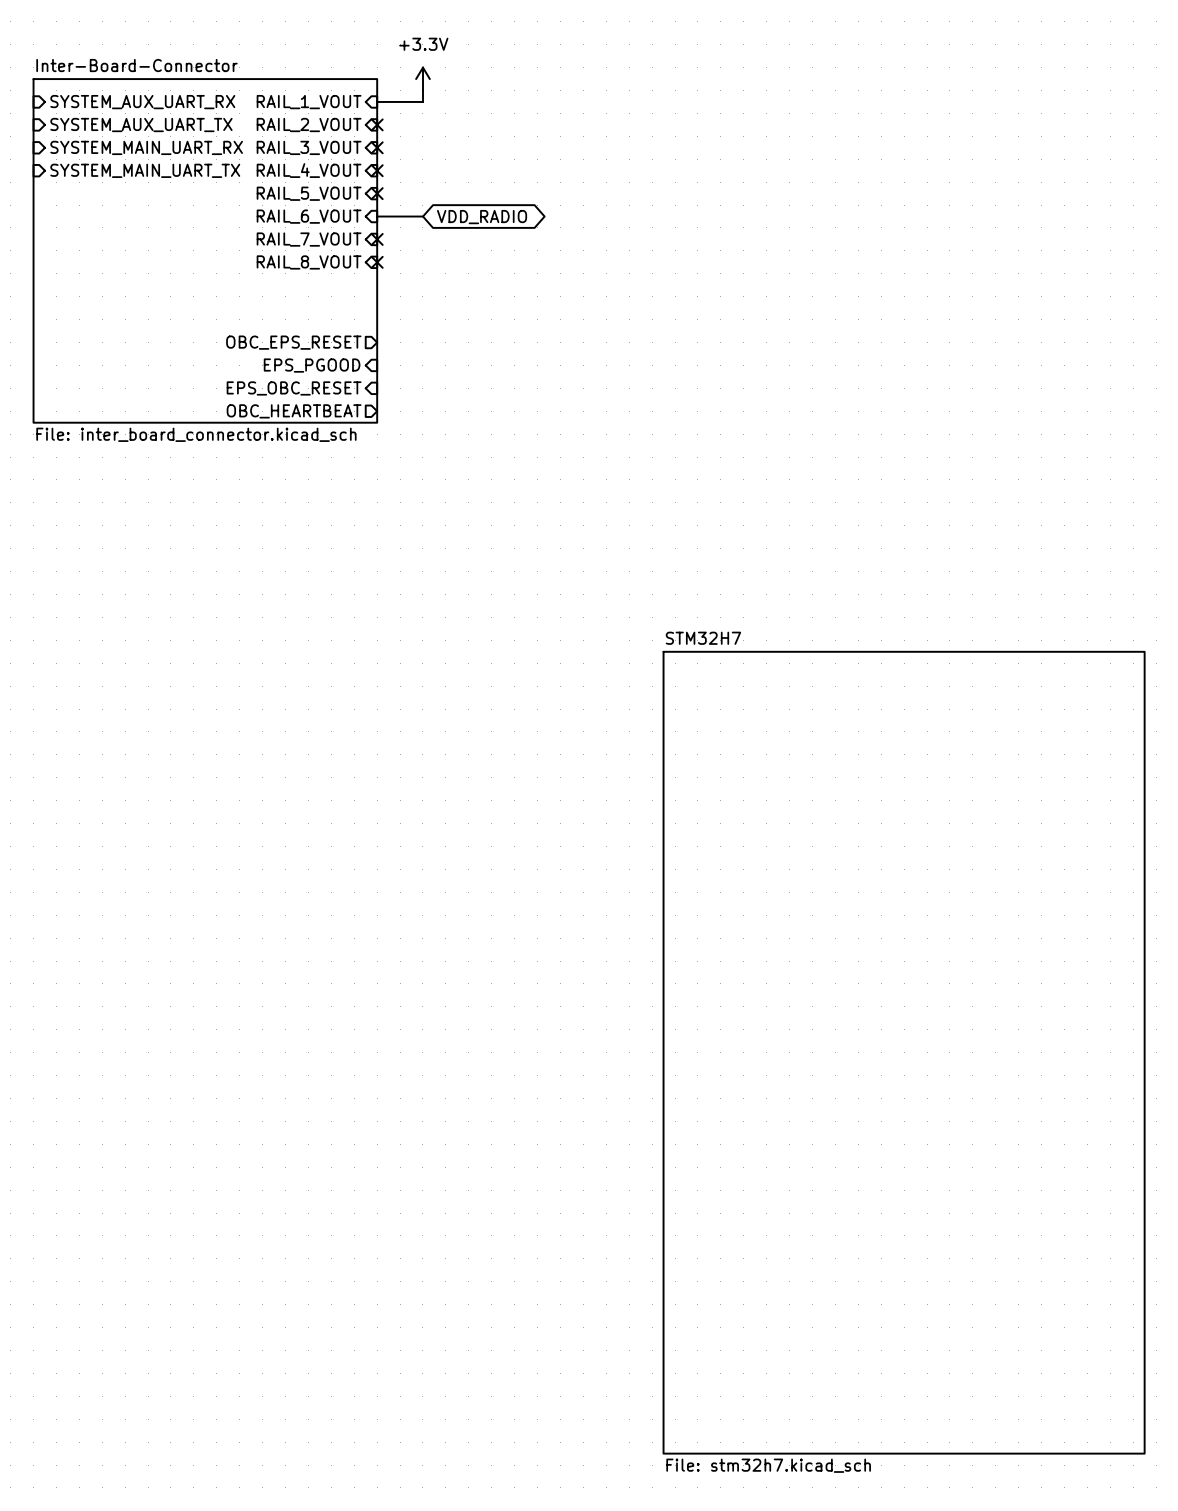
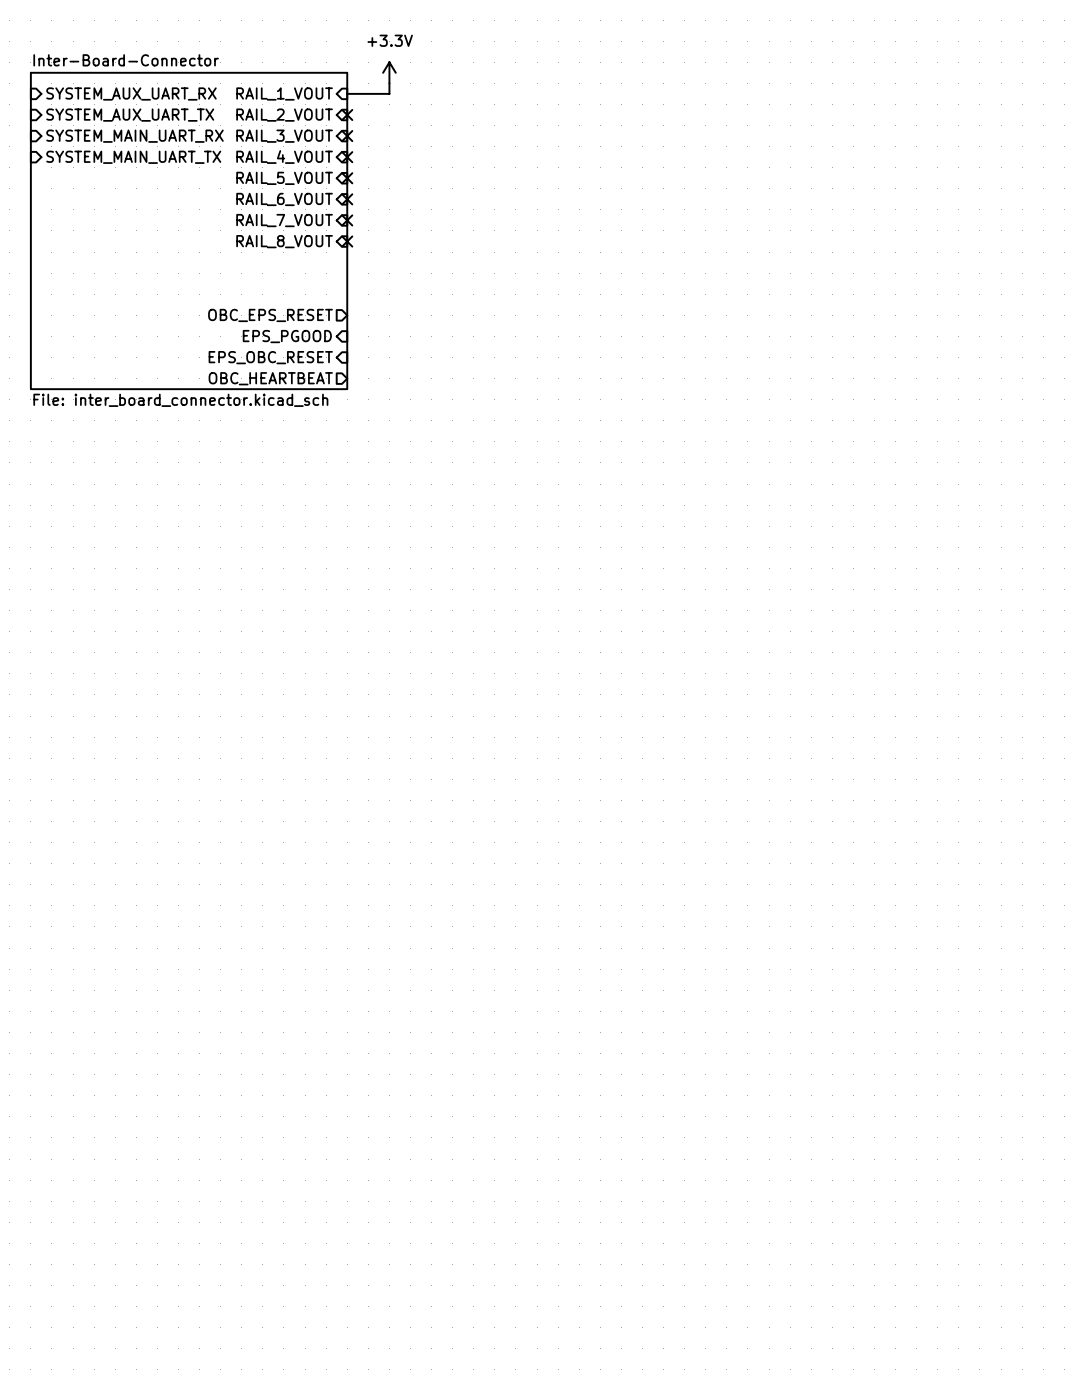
wire: (377, 216) (422, 216) -> none
no-connect mark: none -> (347, 199)
global label: VDD_RADIO (482, 217) -> none
sheet STM32H7: File: stm32h7.kicad_sch (904, 1052) -> none

